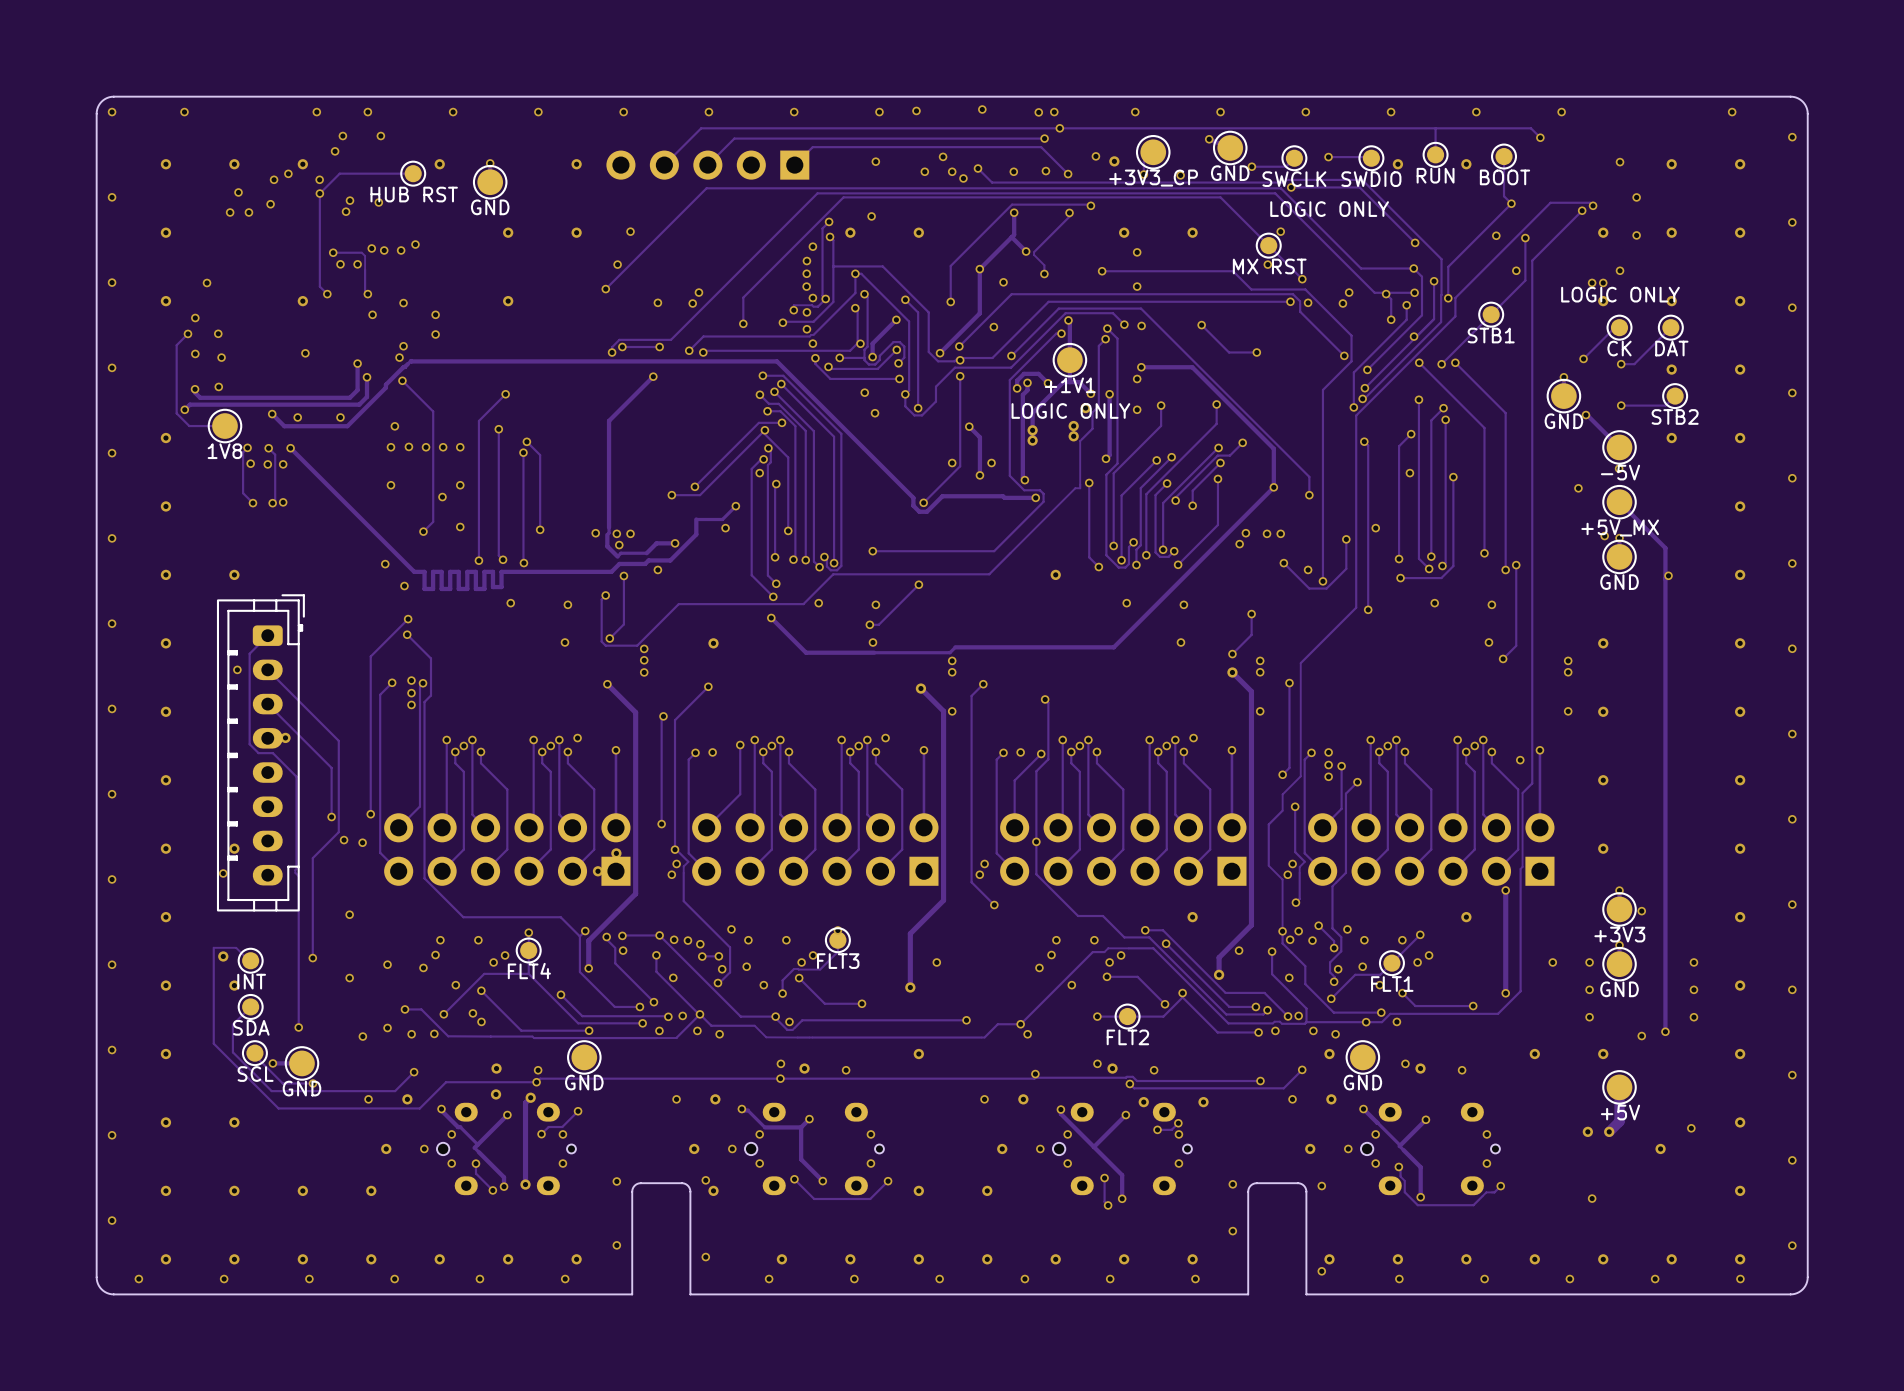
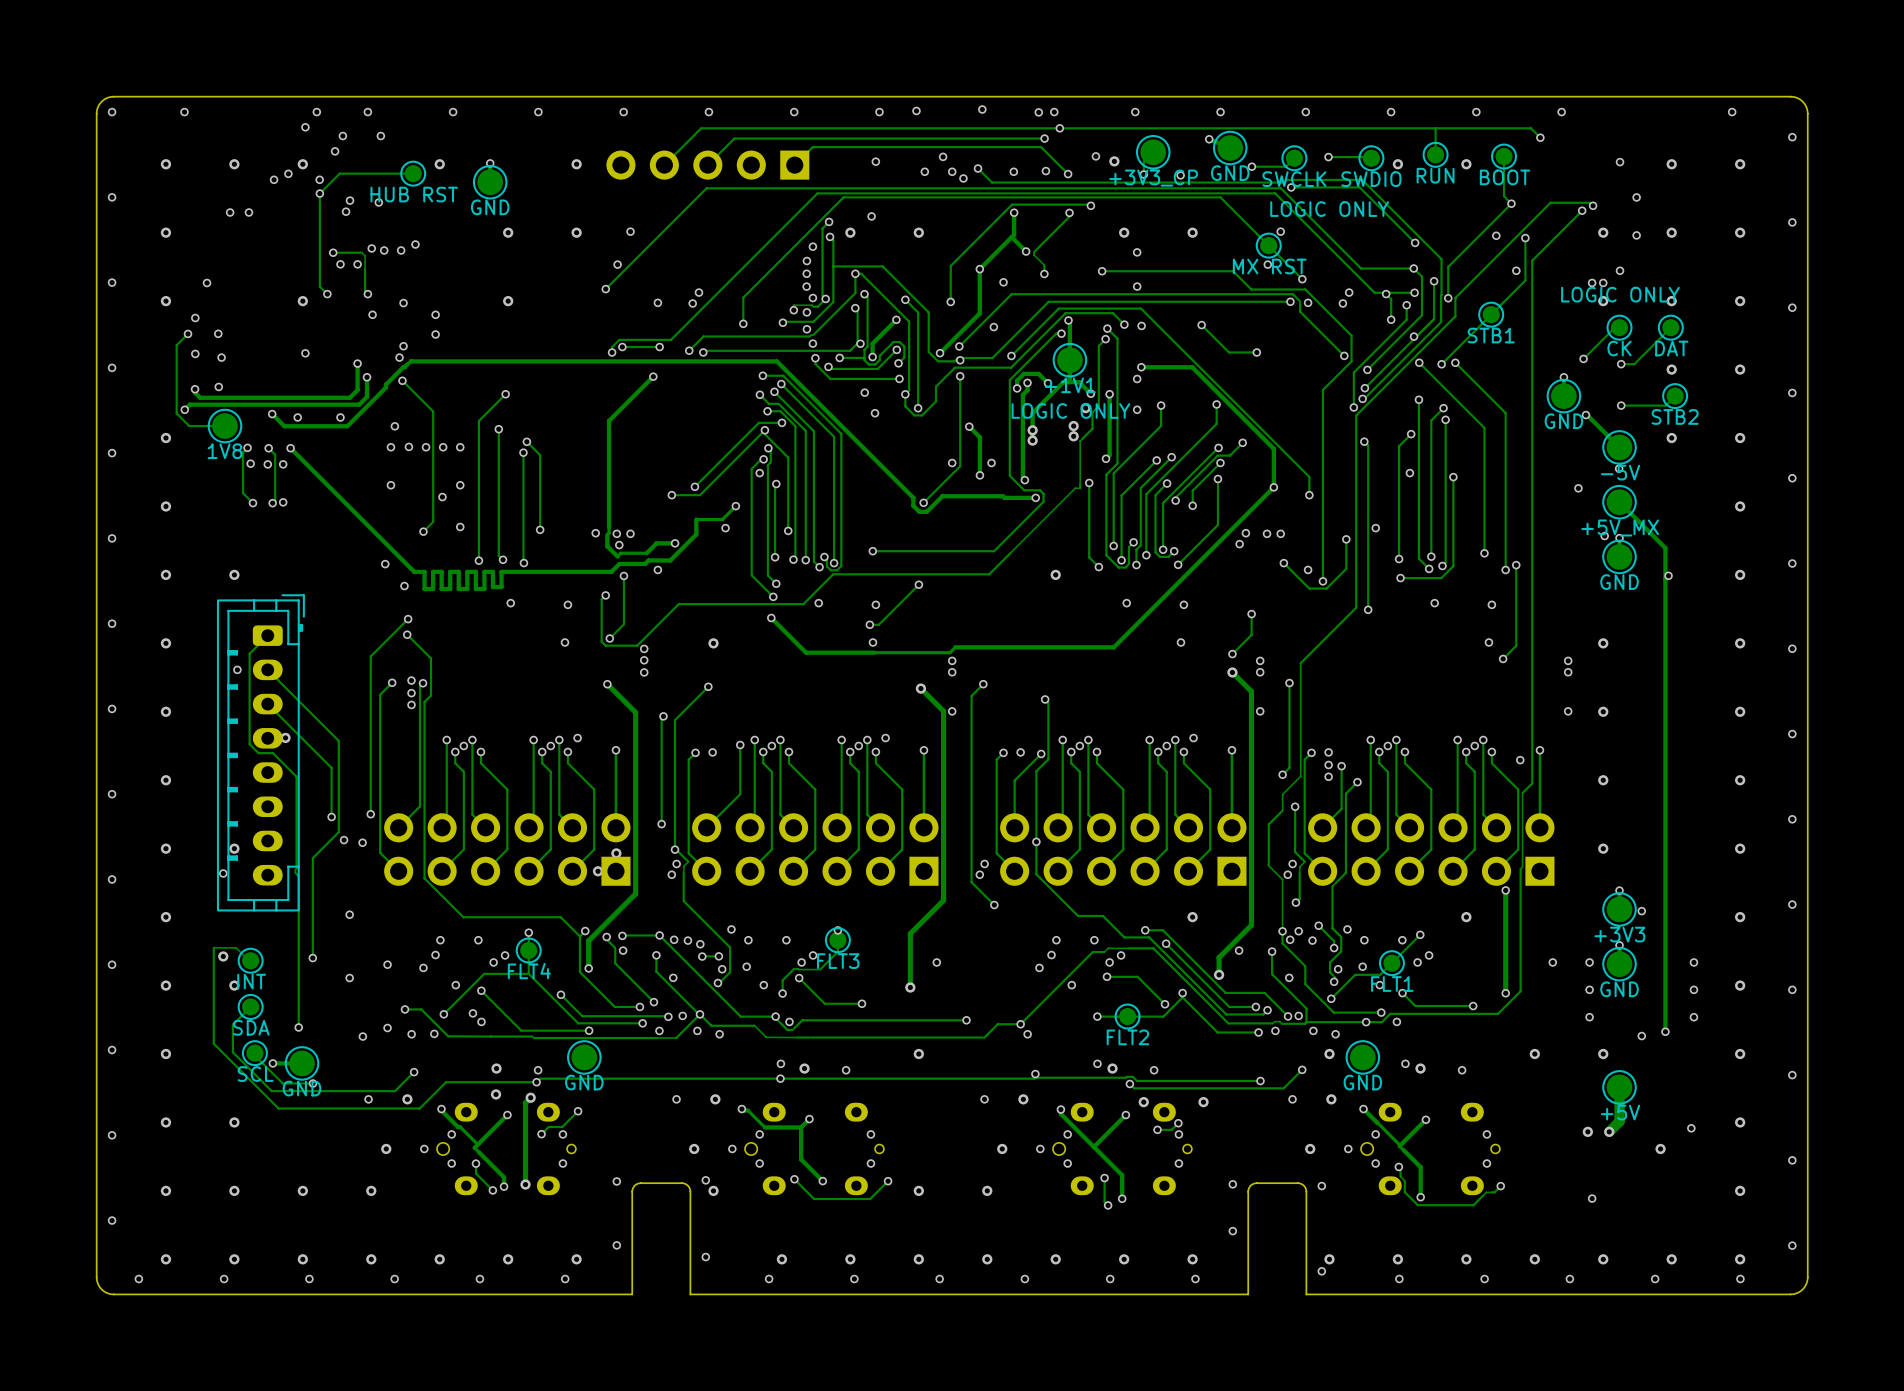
via: none -> (305, 127)
via: (238, 192) -> none
via: (270, 204) -> none

